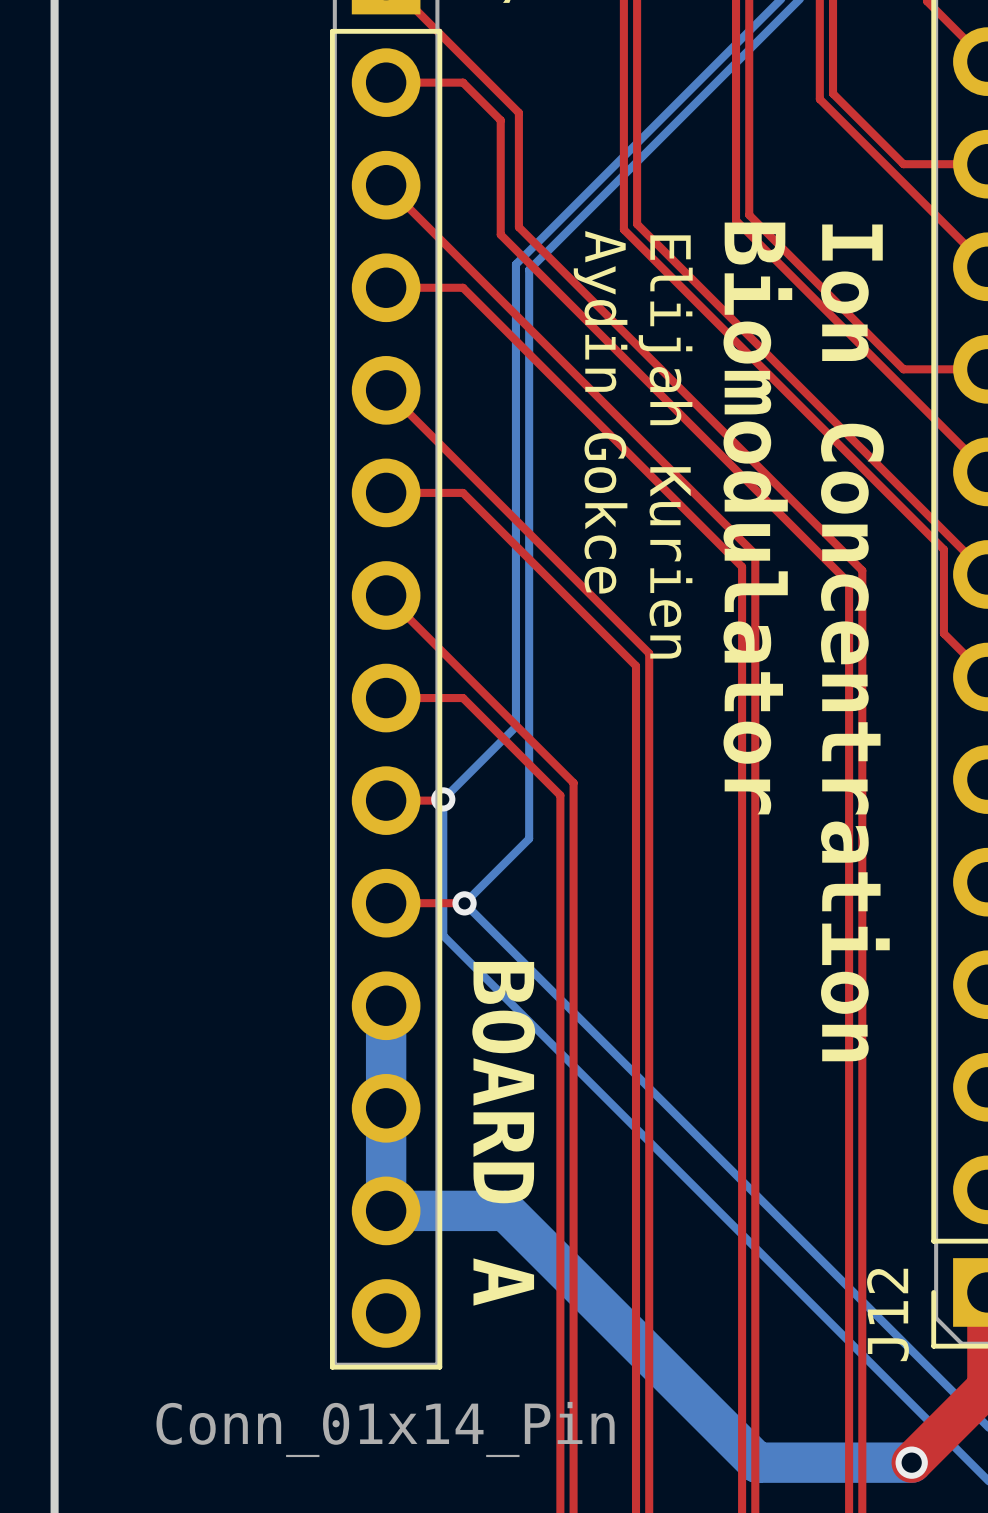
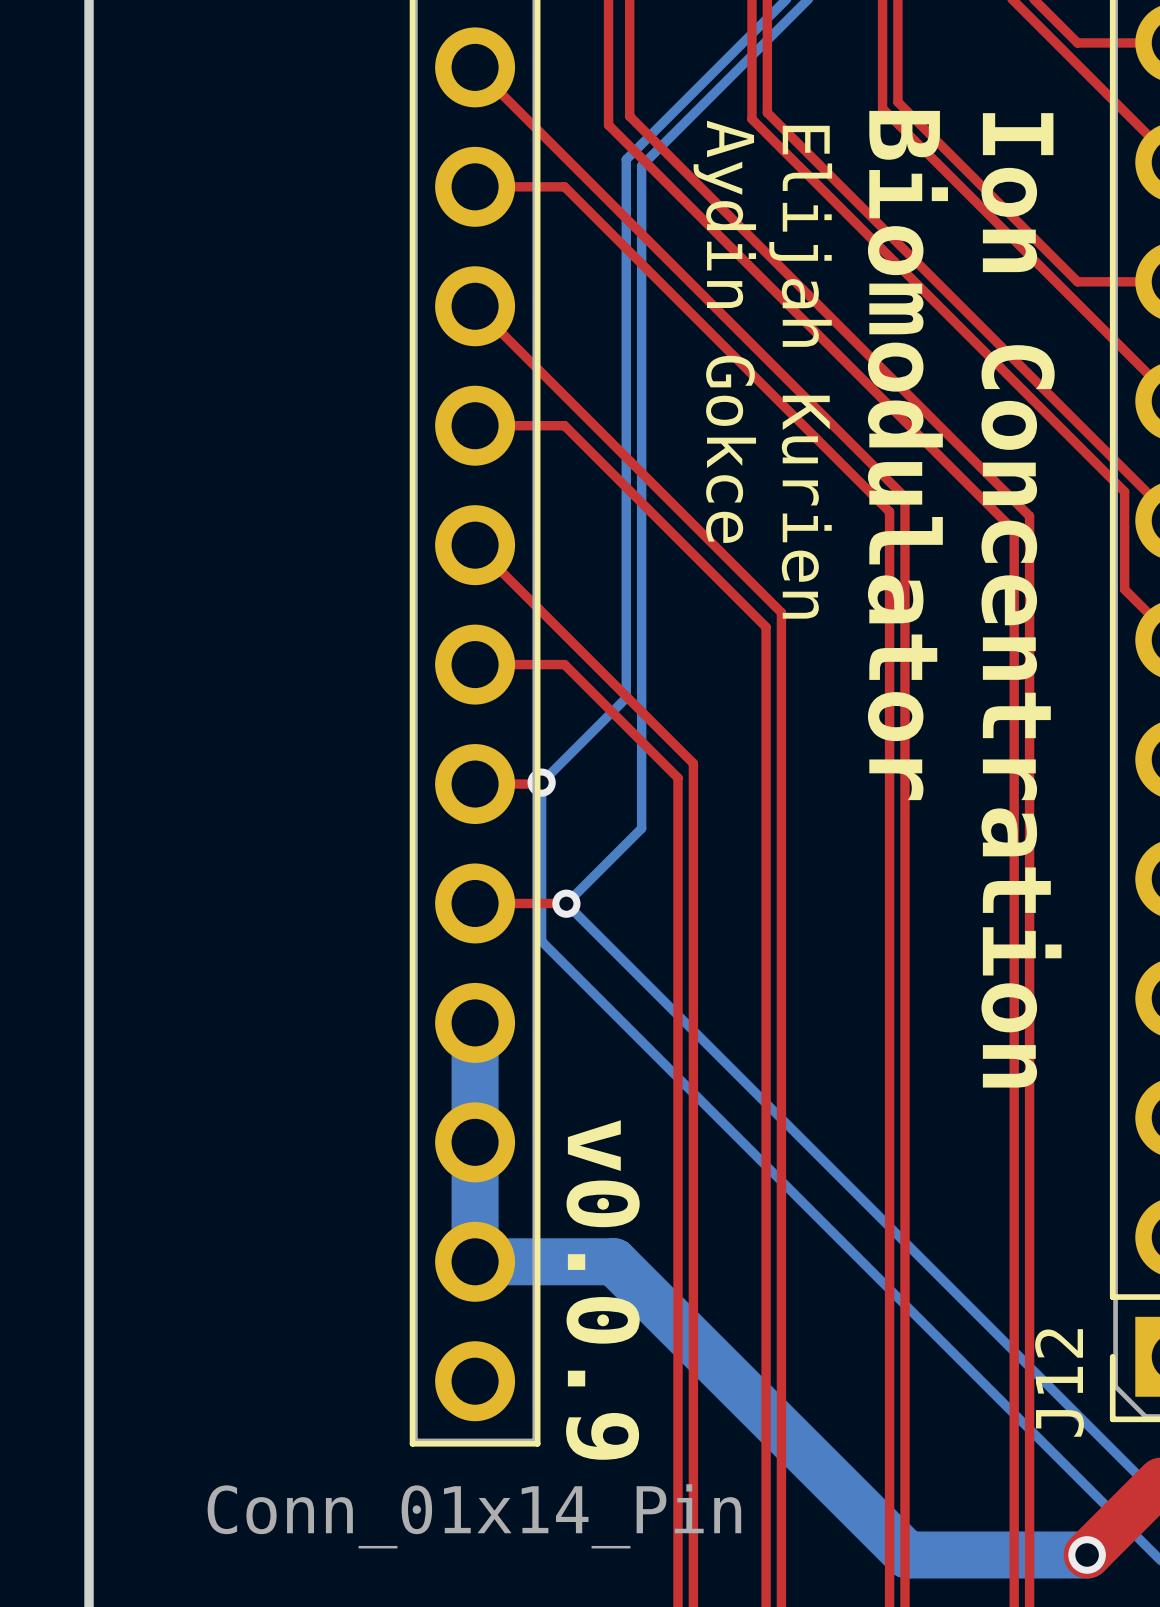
text: BOARD A (503, 1133) -> none
text: none -> v0.0.9 (602, 1290)

